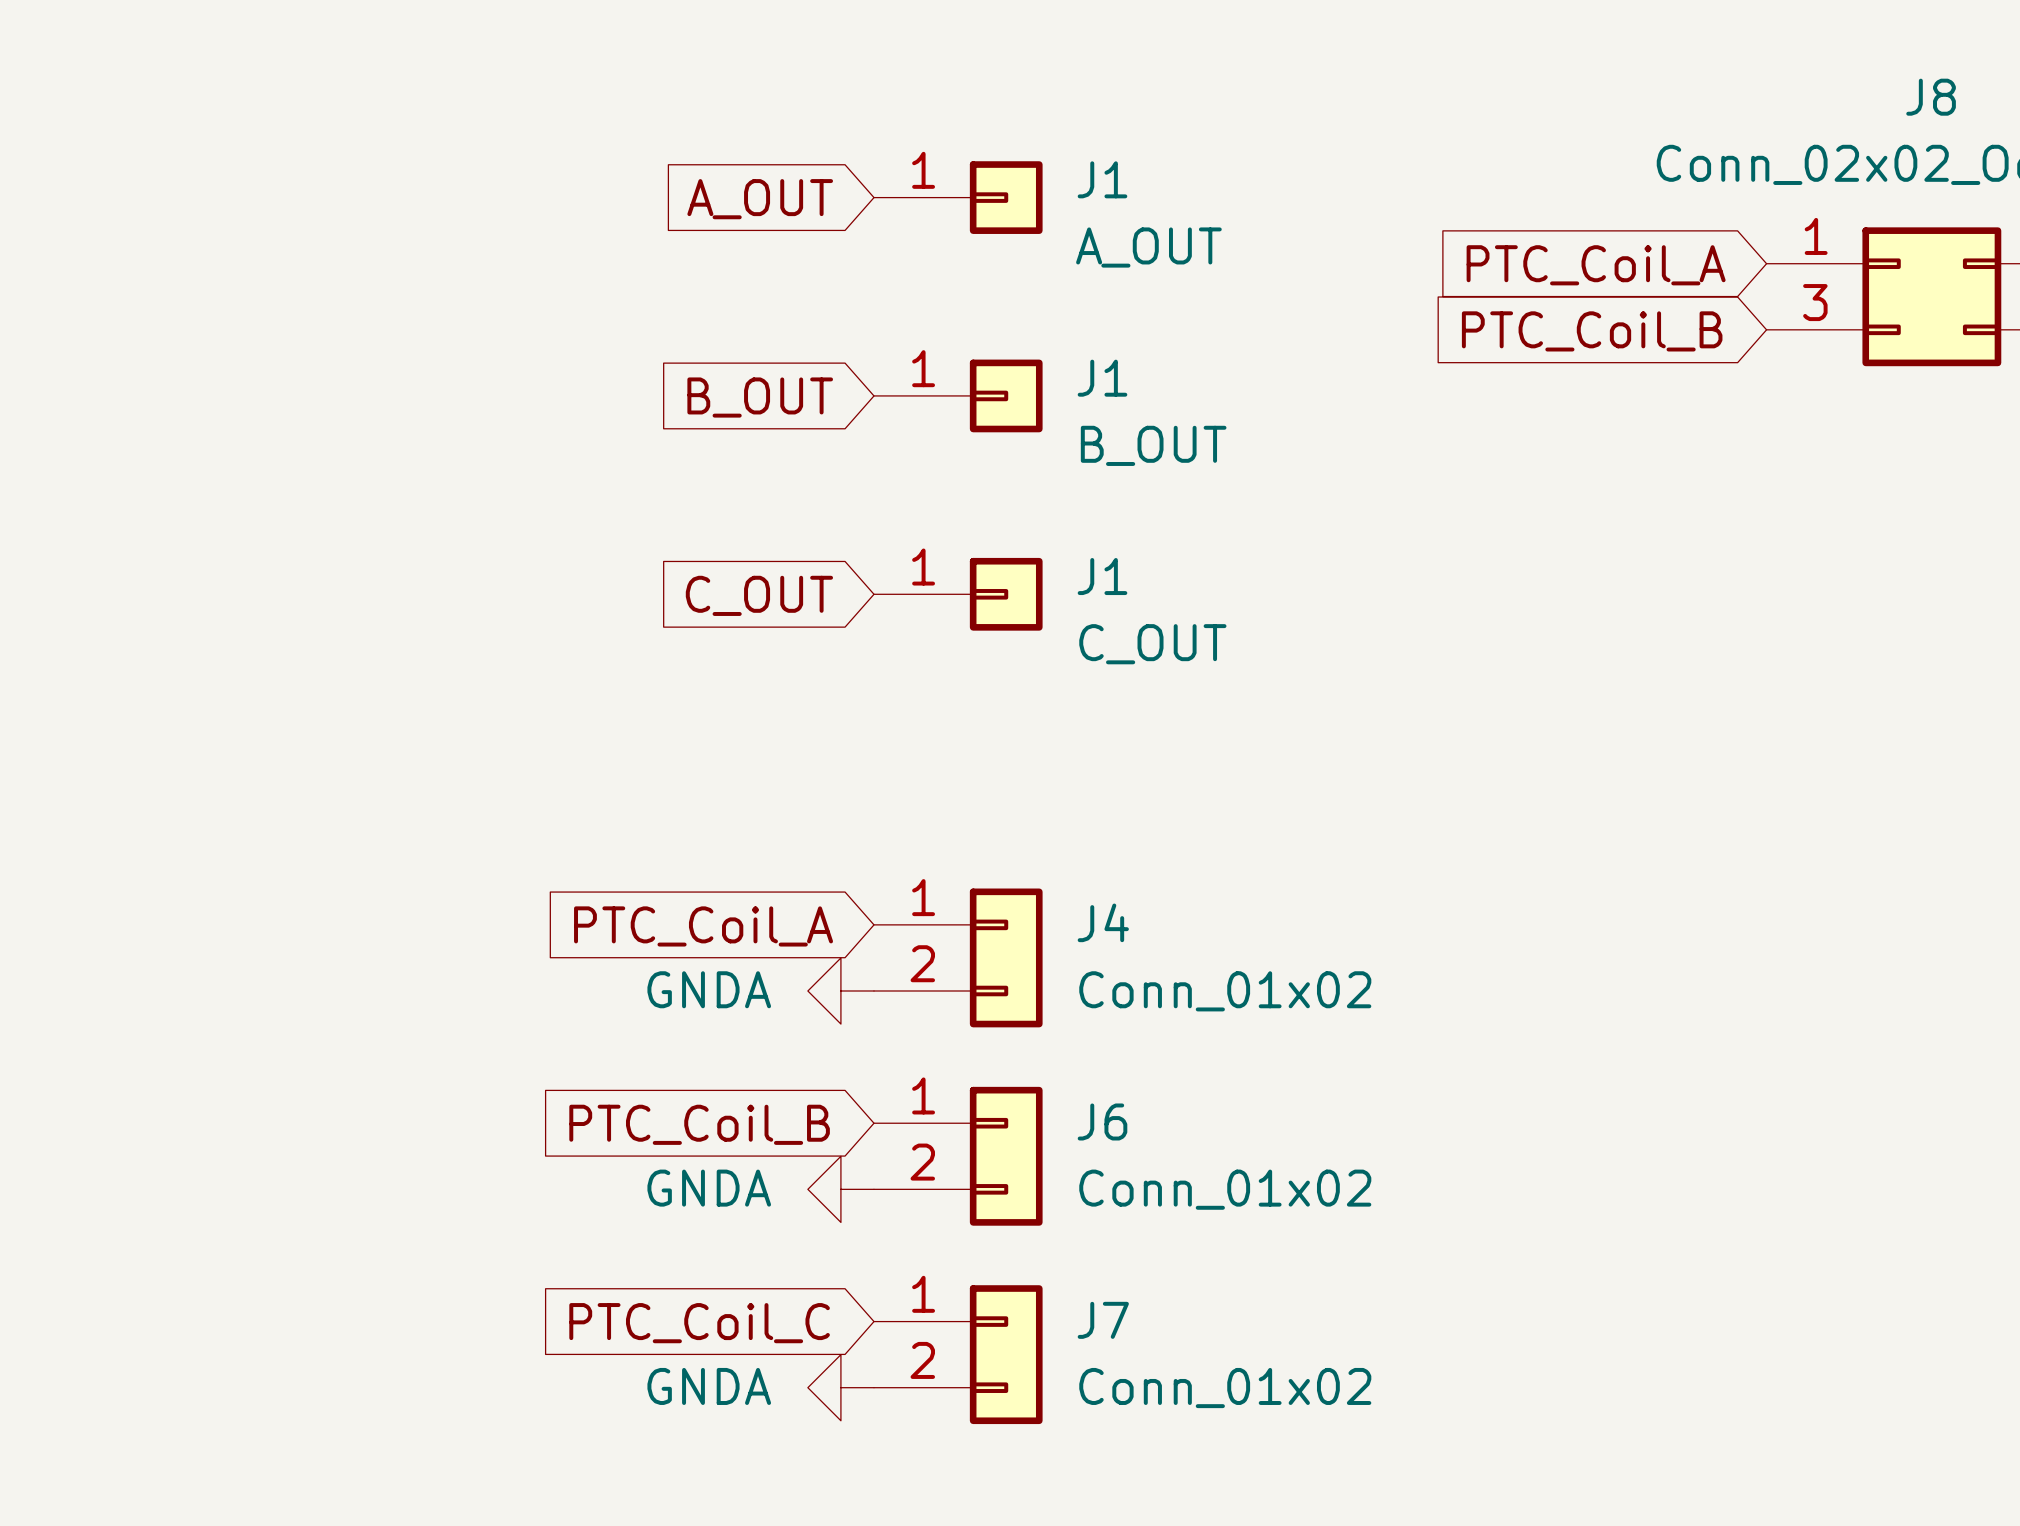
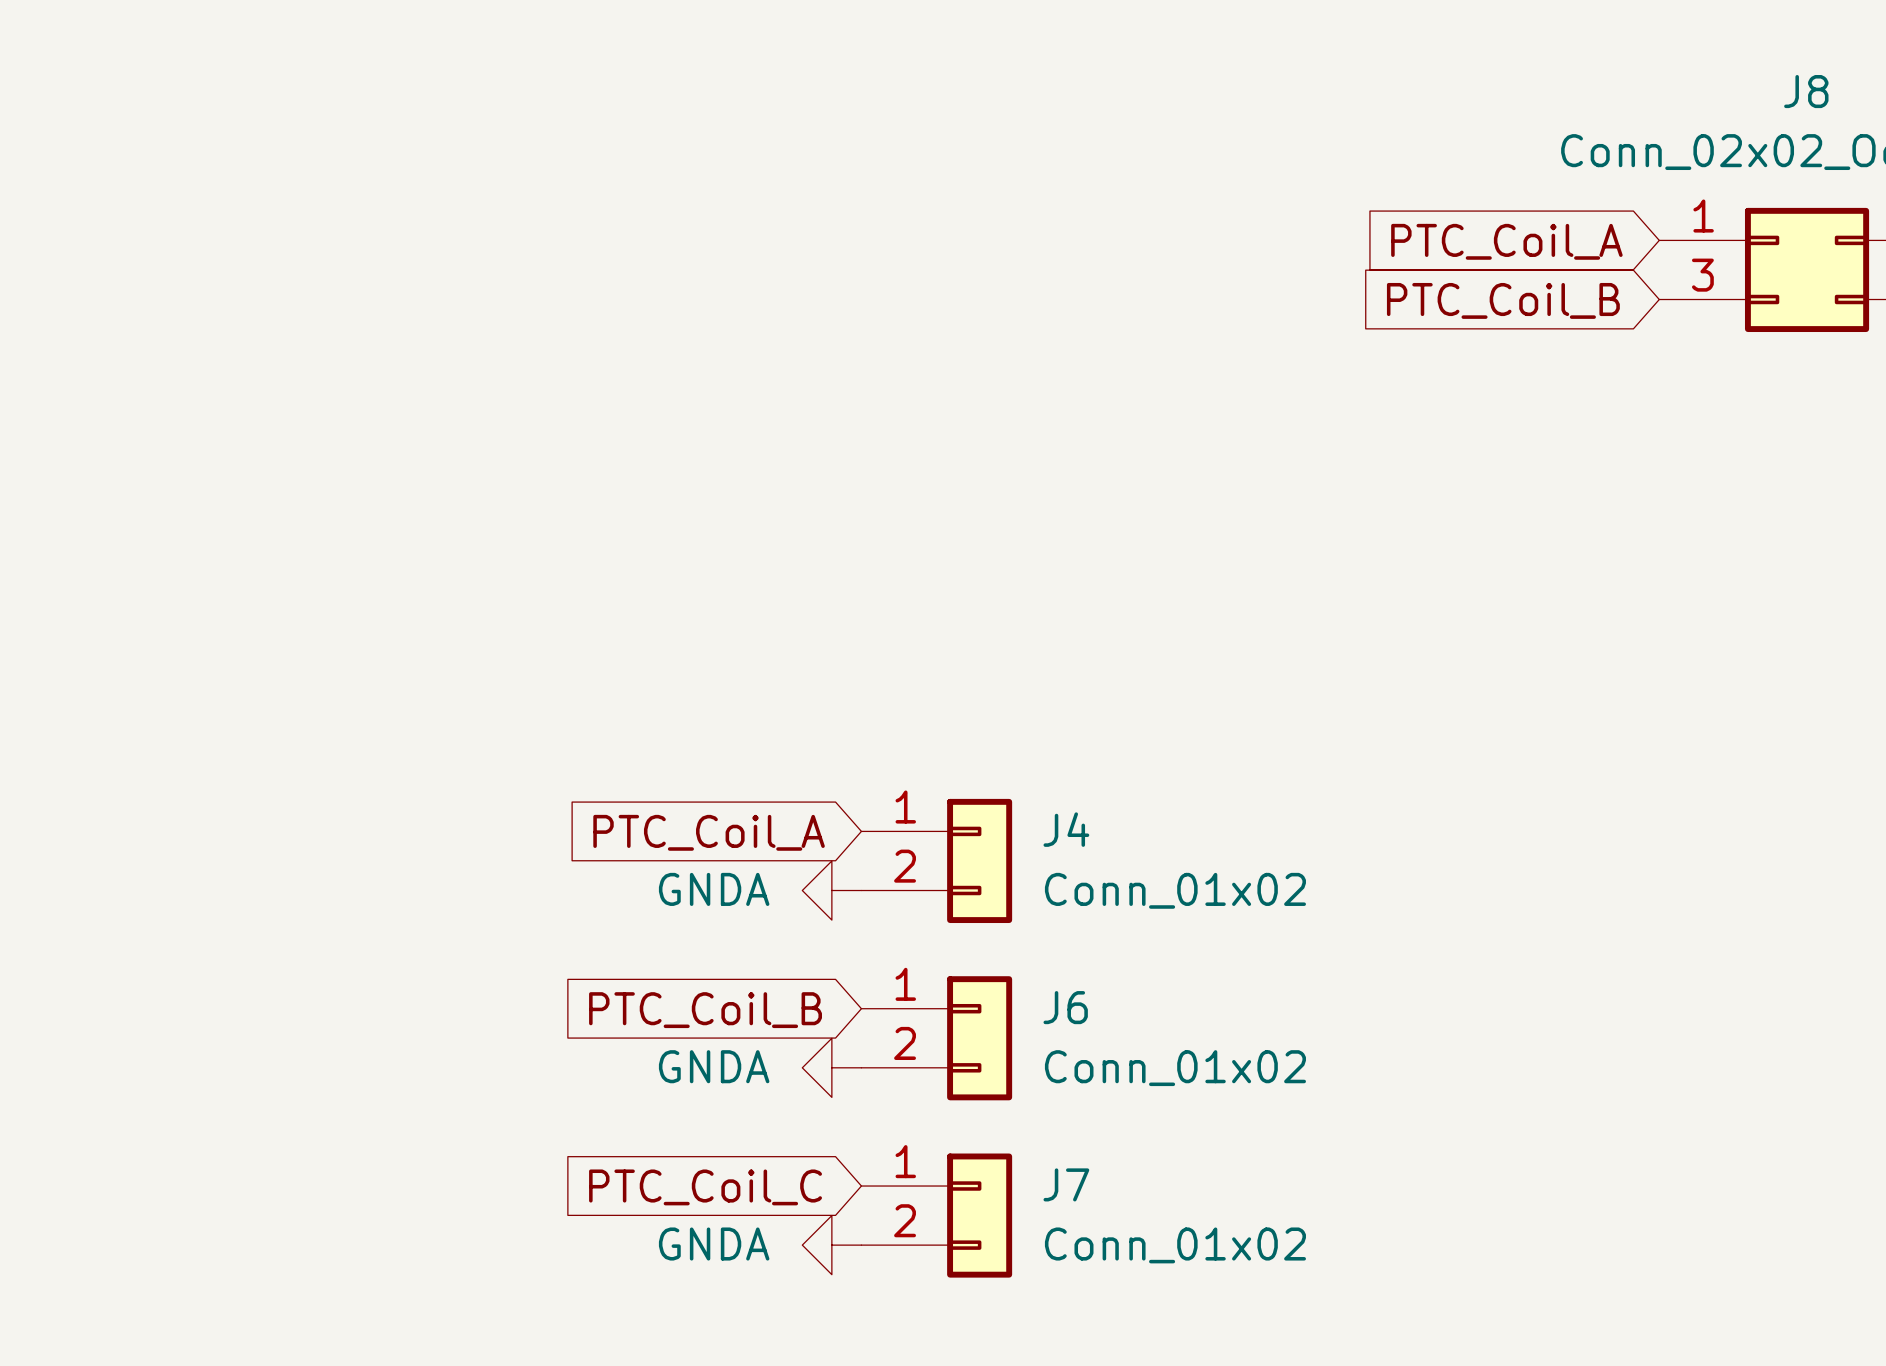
J1: A_OUT (958, 197) -> none
global label: A_OUT (760, 199) -> none
J1: B_OUT (958, 395) -> none
global label: B_OUT (760, 397) -> none
J1: C_OUT (958, 594) -> none
global label: C_OUT (759, 595) -> none

